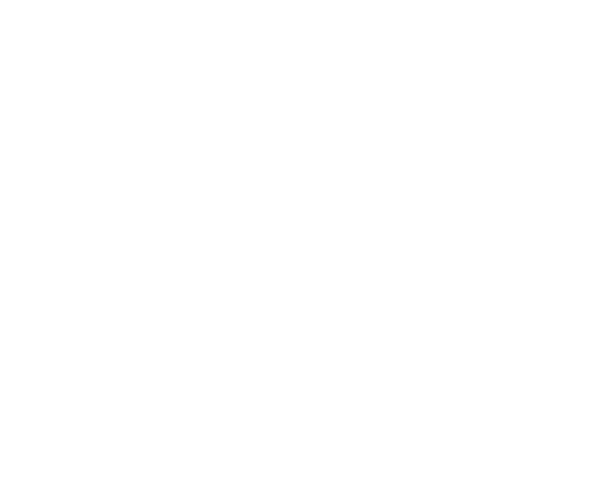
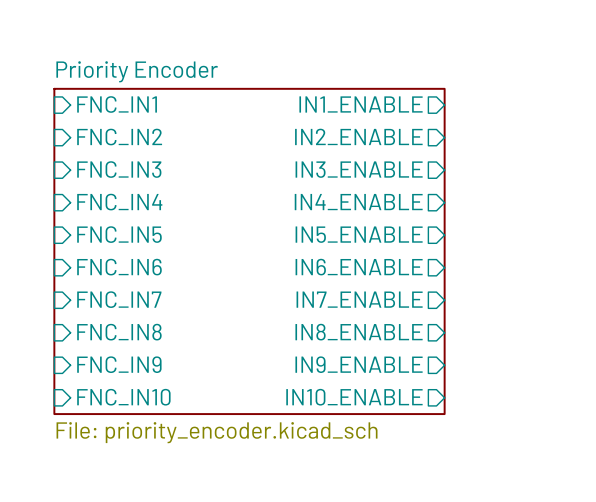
sheet pin: none -> FNC_IN1 (117, 104)
sheet pin: none -> IN1_ENABLE (361, 104)
sheet pin: none -> IN2_ENABLE (358, 136)
sheet pin: none -> FNC_IN2 (119, 137)
sheet pin: none -> FNC_IN3 (119, 169)
sheet pin: none -> IN3_ENABLE (359, 169)
sheet pin: none -> FNC_IN4 (119, 202)
sheet pin: none -> IN4_ENABLE (358, 202)
sheet pin: none -> FNC_IN5 (119, 234)
sheet pin: none -> IN5_ENABLE (359, 234)
sheet Priority Encoder: none -> File: priority_encoder.kicad_sch (249, 251)
sheet pin: none -> FNC_IN6 (119, 267)
sheet pin: none -> IN6_ENABLE (359, 267)
sheet pin: none -> FNC_IN7 (119, 299)
sheet pin: none -> IN7_ENABLE (359, 299)
sheet pin: none -> FNC_IN8 (119, 332)
sheet pin: none -> IN8_ENABLE (359, 332)
sheet pin: none -> FNC_IN9 (119, 364)
sheet pin: none -> IN9_ENABLE (359, 364)
sheet pin: none -> FNC_IN10 (123, 397)
sheet pin: none -> IN10_ENABLE (354, 397)

